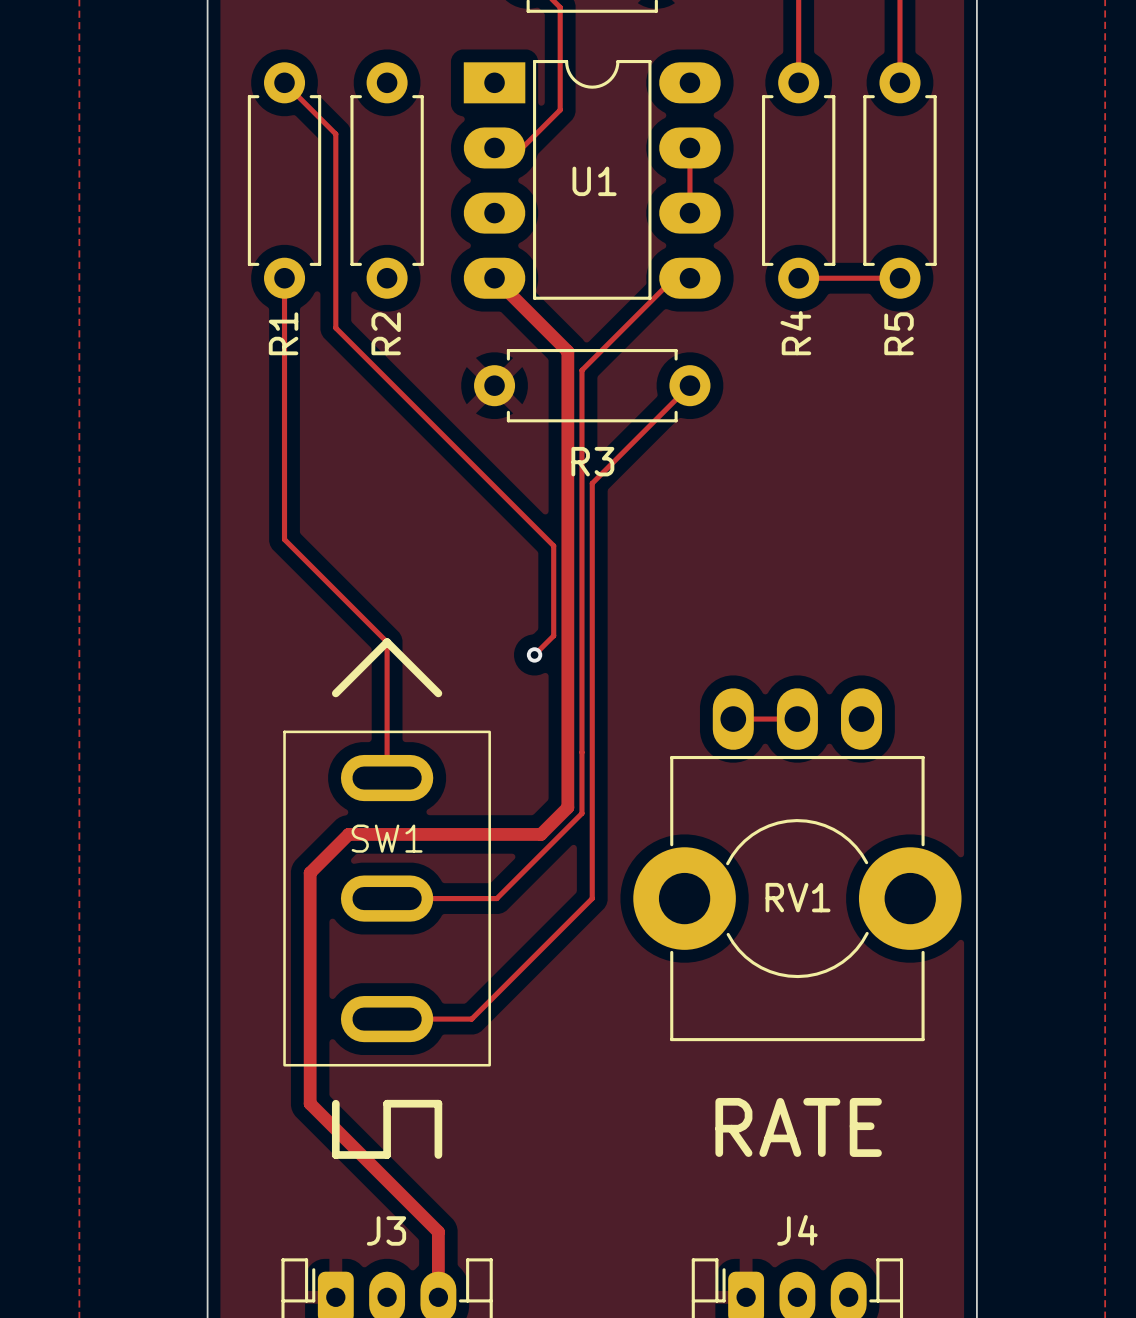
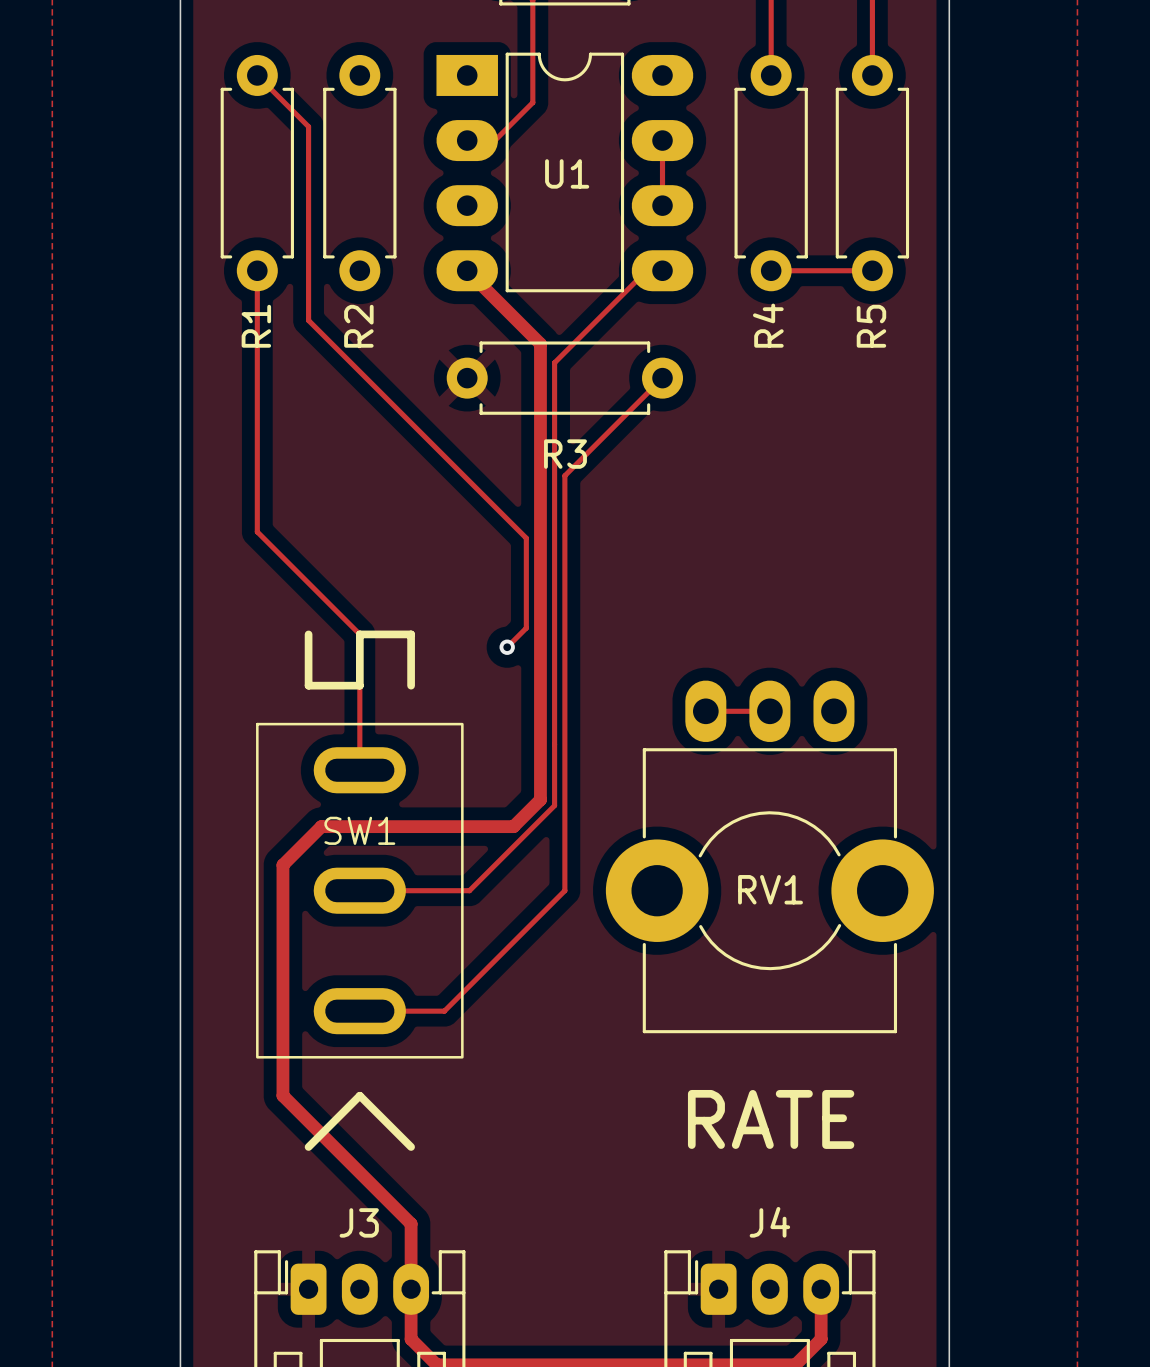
line: (335, 693) (387, 642) (438, 693) -> (308, 634) (308, 685) (359, 685) (359, 634) (411, 634) (411, 685)
line: (335, 1103) (335, 1155) (387, 1155) (387, 1103) (438, 1103) (438, 1155) -> (308, 1146) (359, 1095) (411, 1146)

